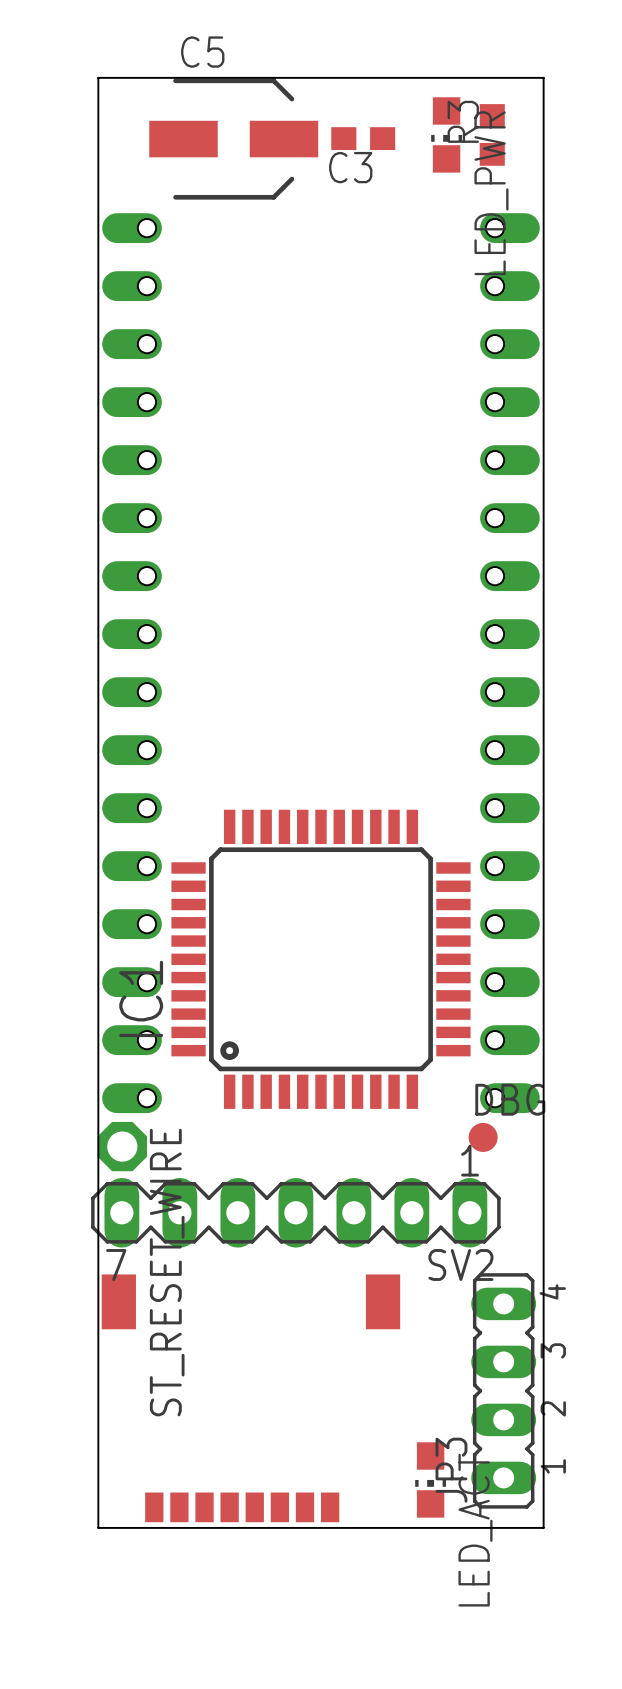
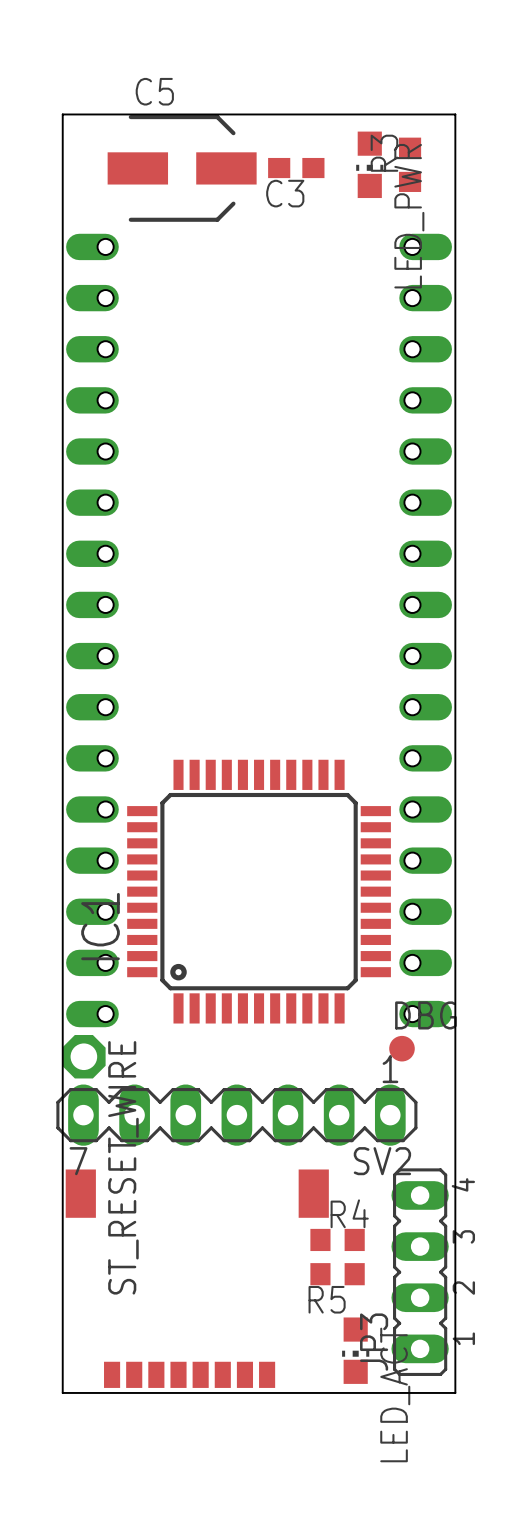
R4: none -> (337, 1239)
R5: none -> (337, 1274)

